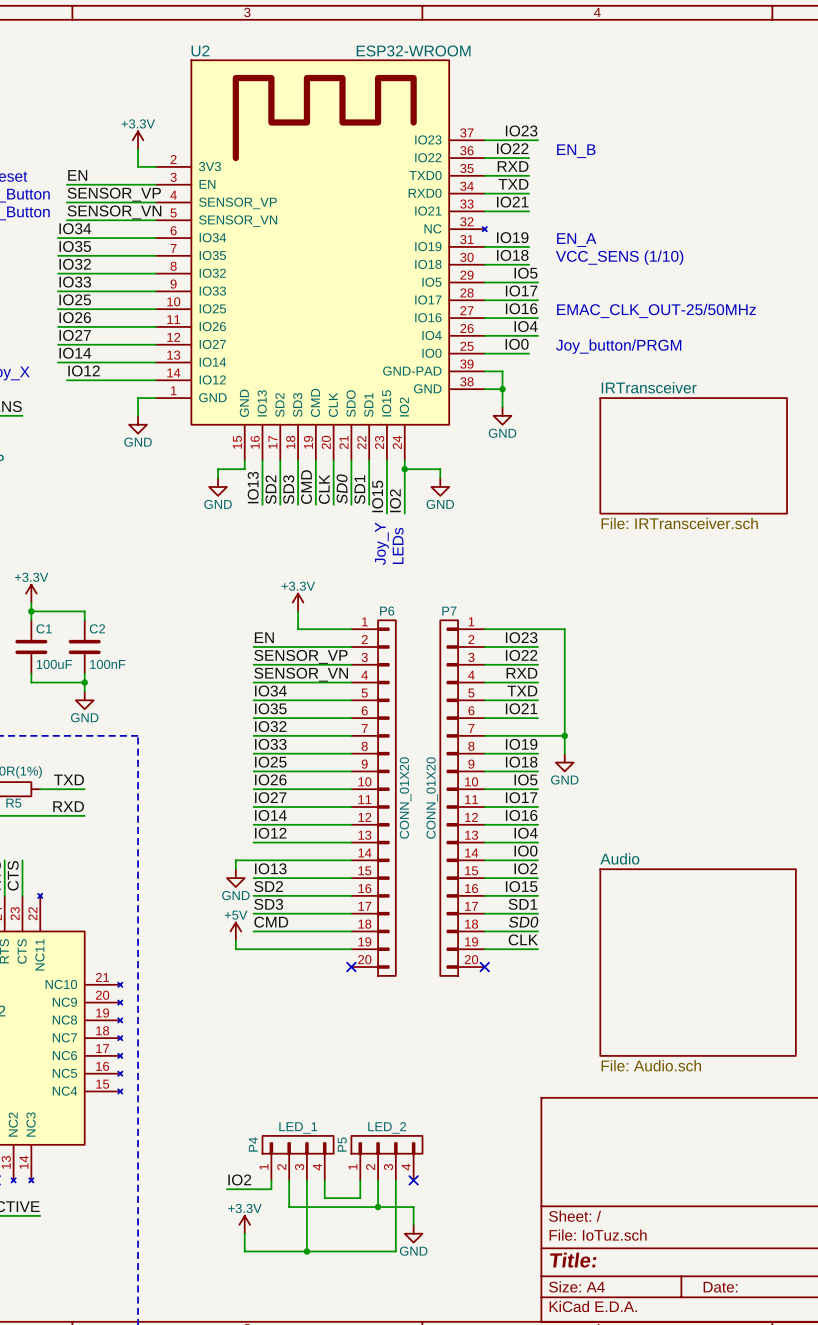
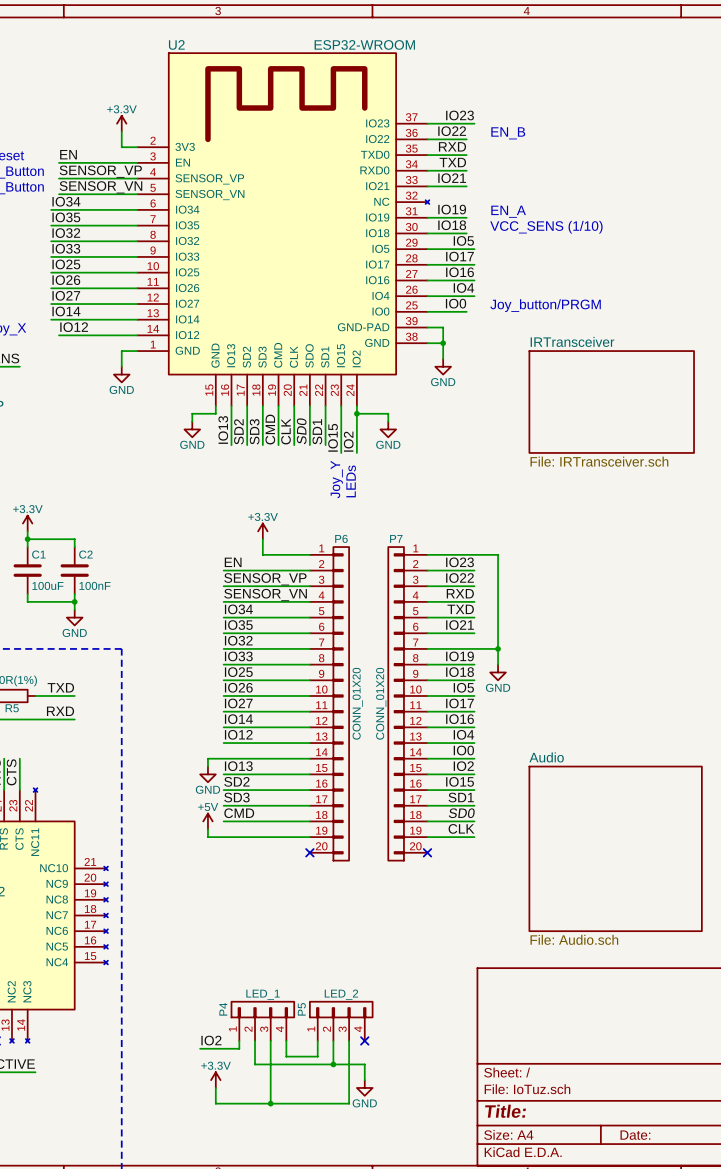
text: EMAC_CLK_OUT-25/50MHz (656, 310) -> none

